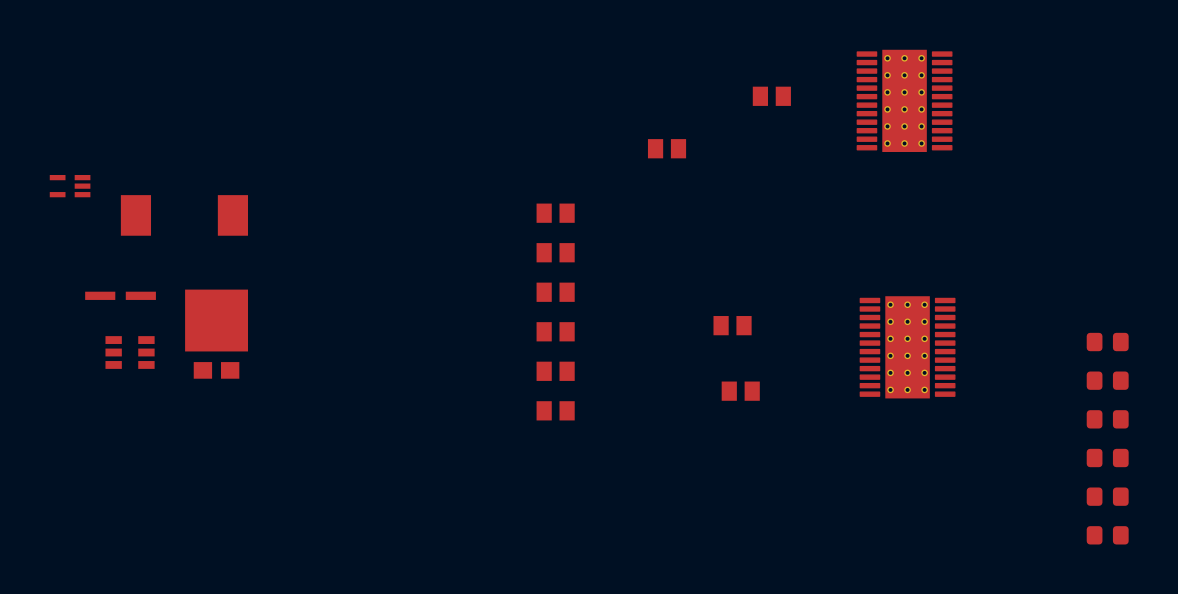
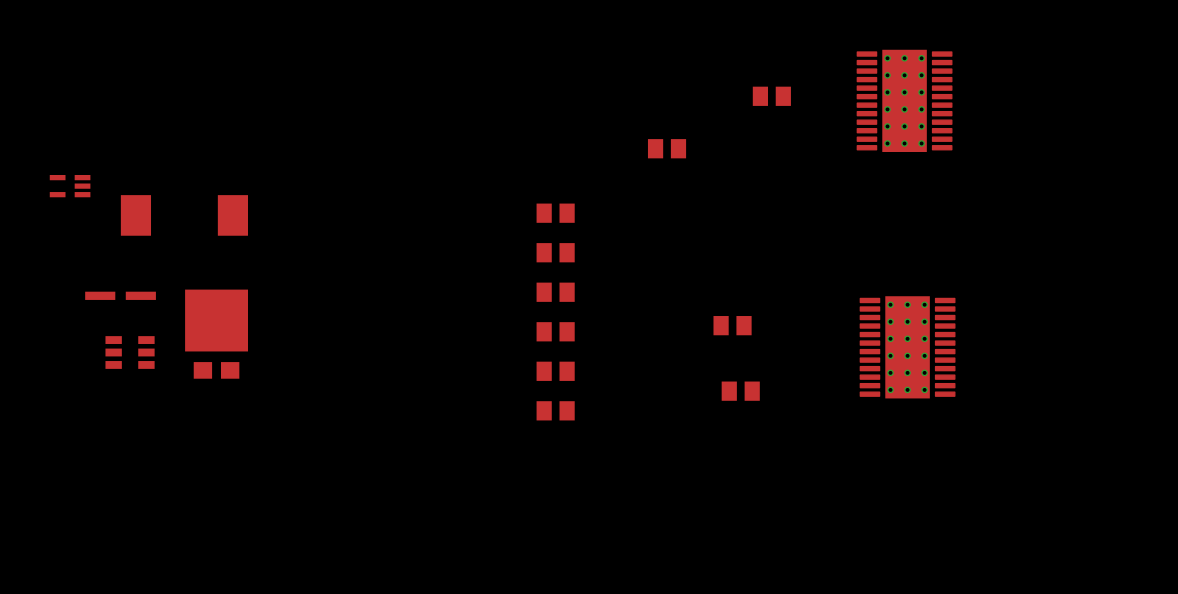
part: (1107, 342) -> none
part: (1107, 380) -> none
part: (1107, 419) -> none
part: (1107, 458) -> none
part: (1107, 496) -> none
part: (1107, 535) -> none

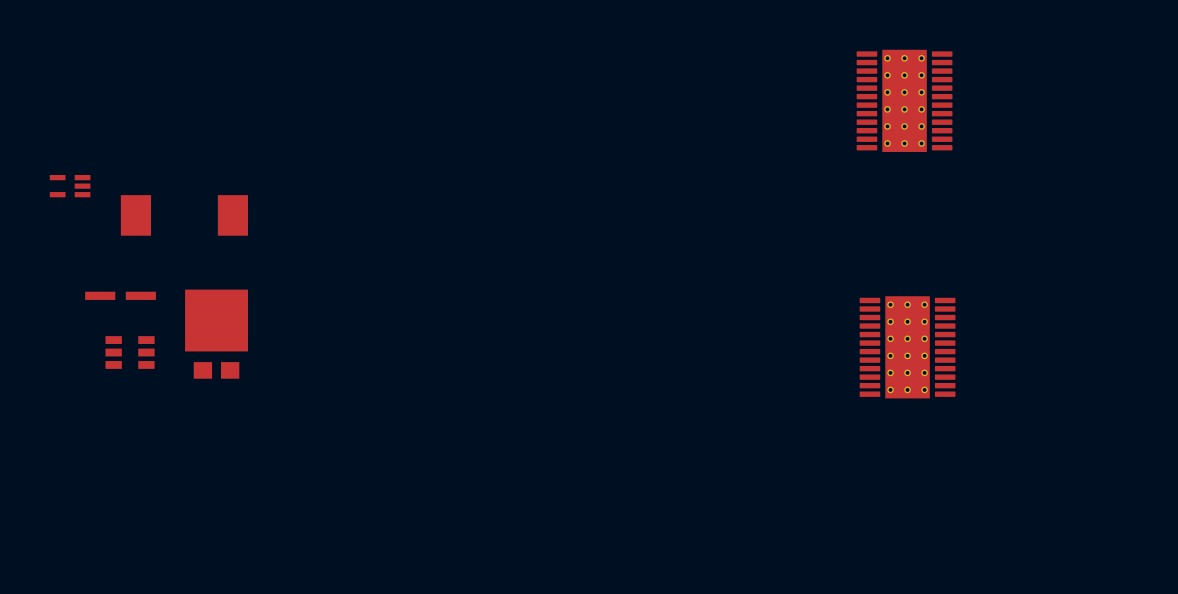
part: (771, 96) -> none
part: (667, 148) -> none
part: (555, 213) -> none
part: (555, 252) -> none
part: (555, 292) -> none
part: (732, 325) -> none
part: (555, 331) -> none
part: (555, 371) -> none
part: (740, 391) -> none
part: (555, 410) -> none

